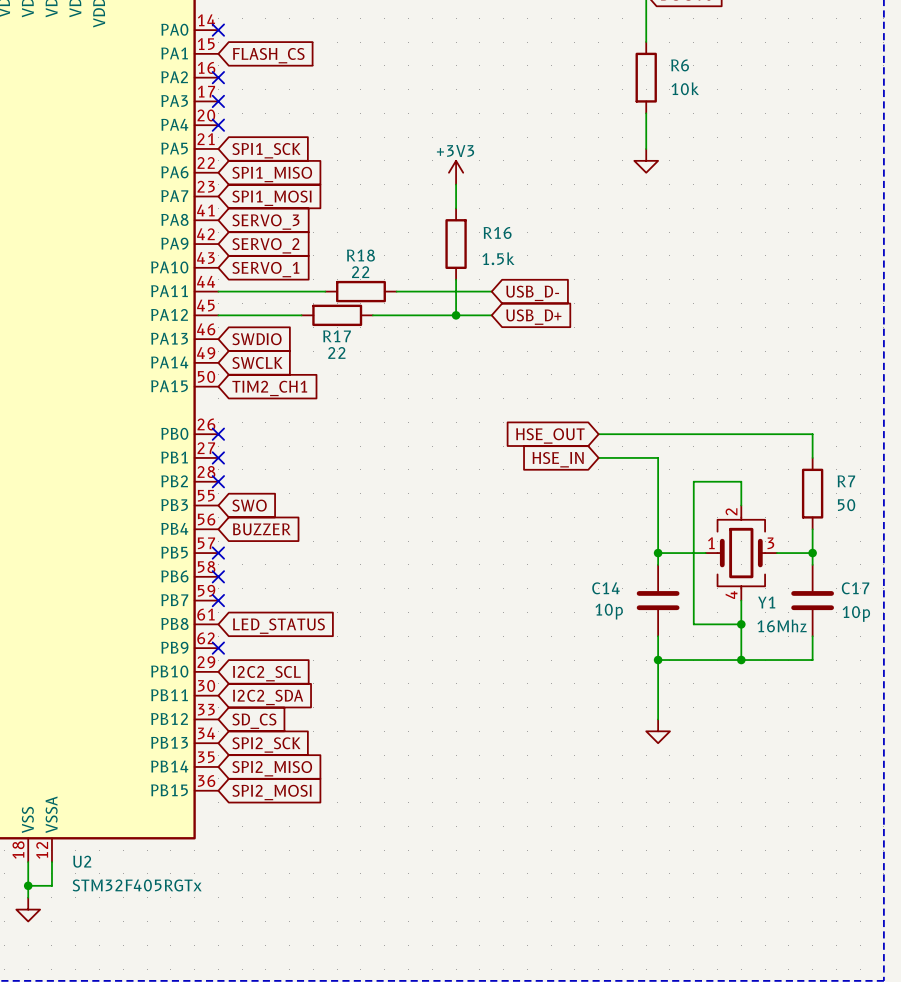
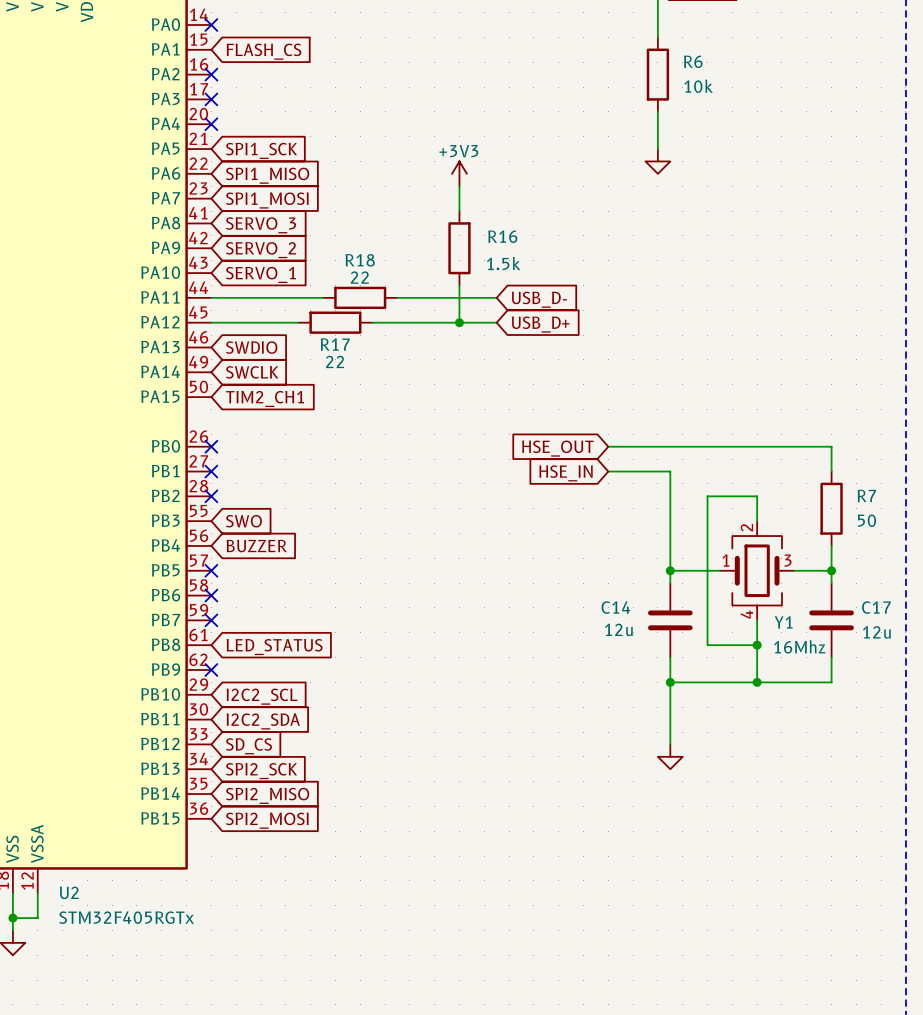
C14 value: 10p (609, 611) -> 12u (618, 629)
C17 value: 10p (856, 613) -> 12u (876, 632)

